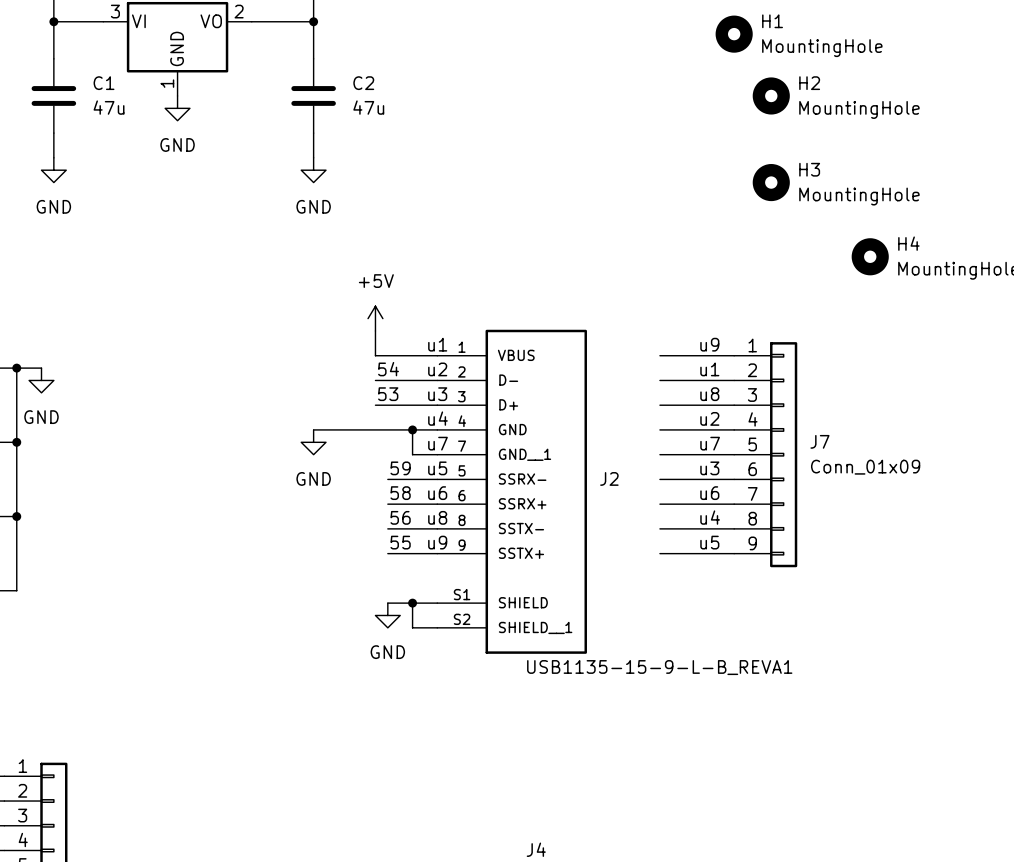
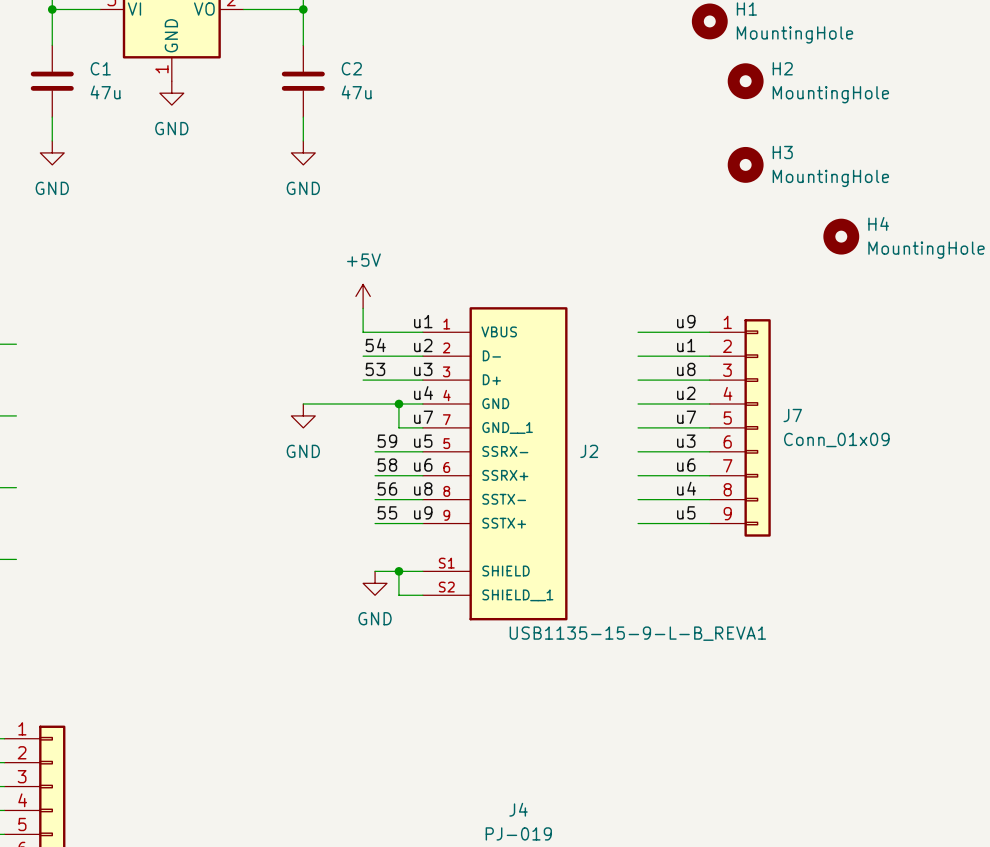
junction: (16, 368) -> none
wire: (41, 368) (16, 368) (16, 590) -> none
power symbol: GND (41, 380) -> none
junction: (16, 442) -> none
junction: (16, 516) -> none

